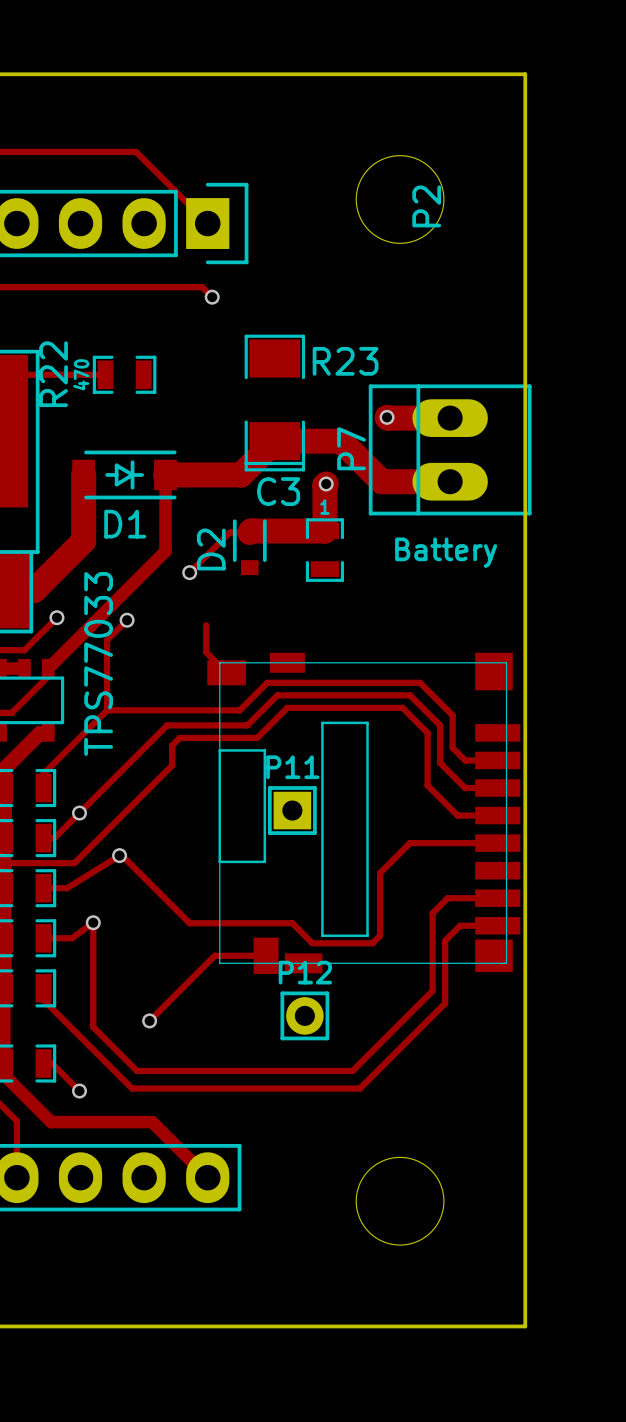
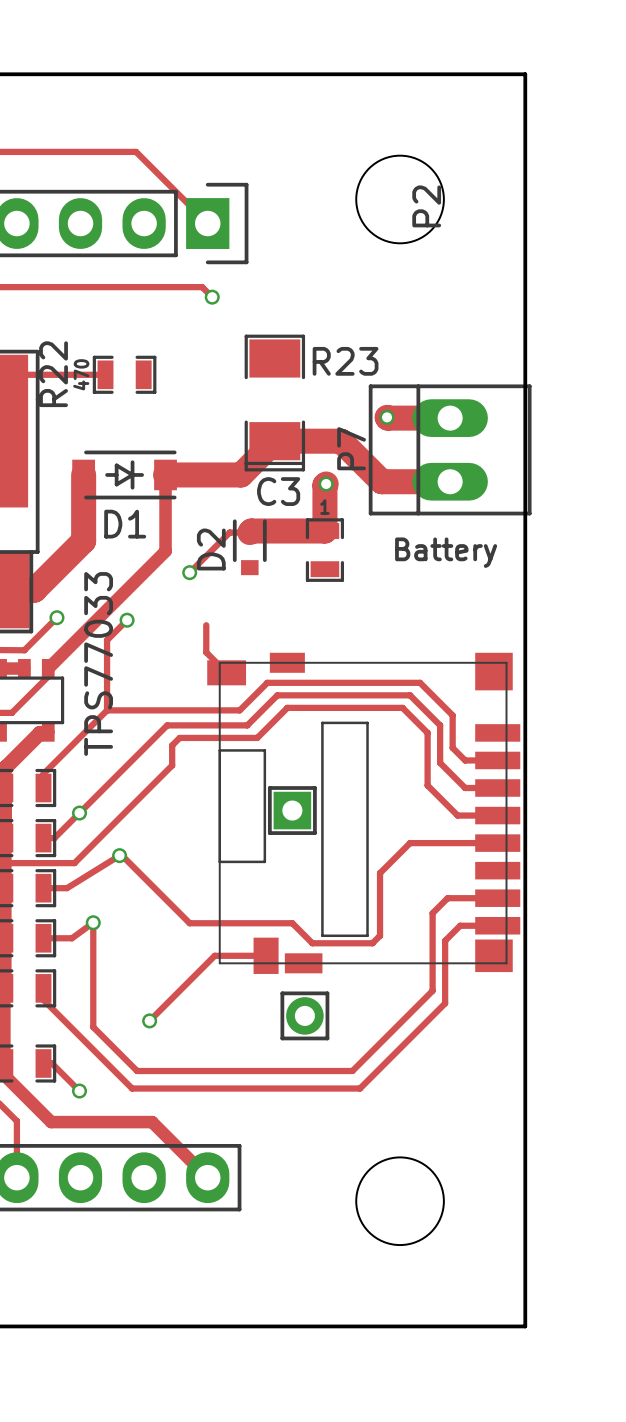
P11 name: P11 (292, 767) -> none
P12 name: P12 (305, 972) -> none

